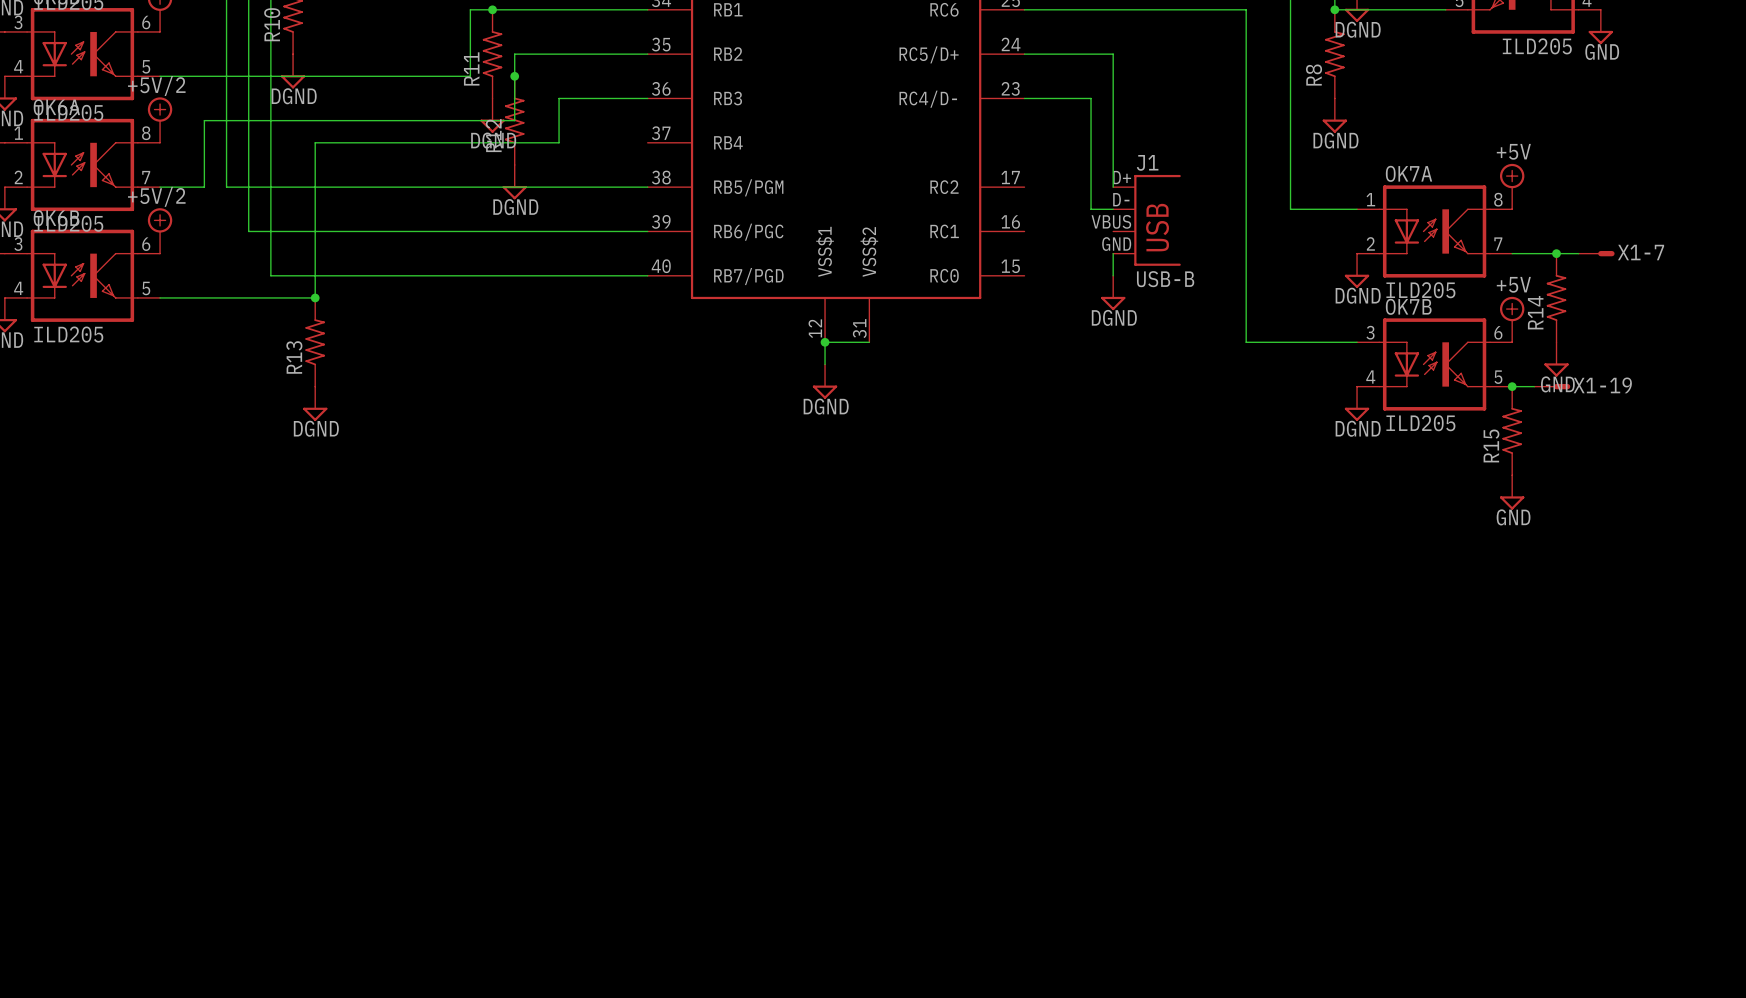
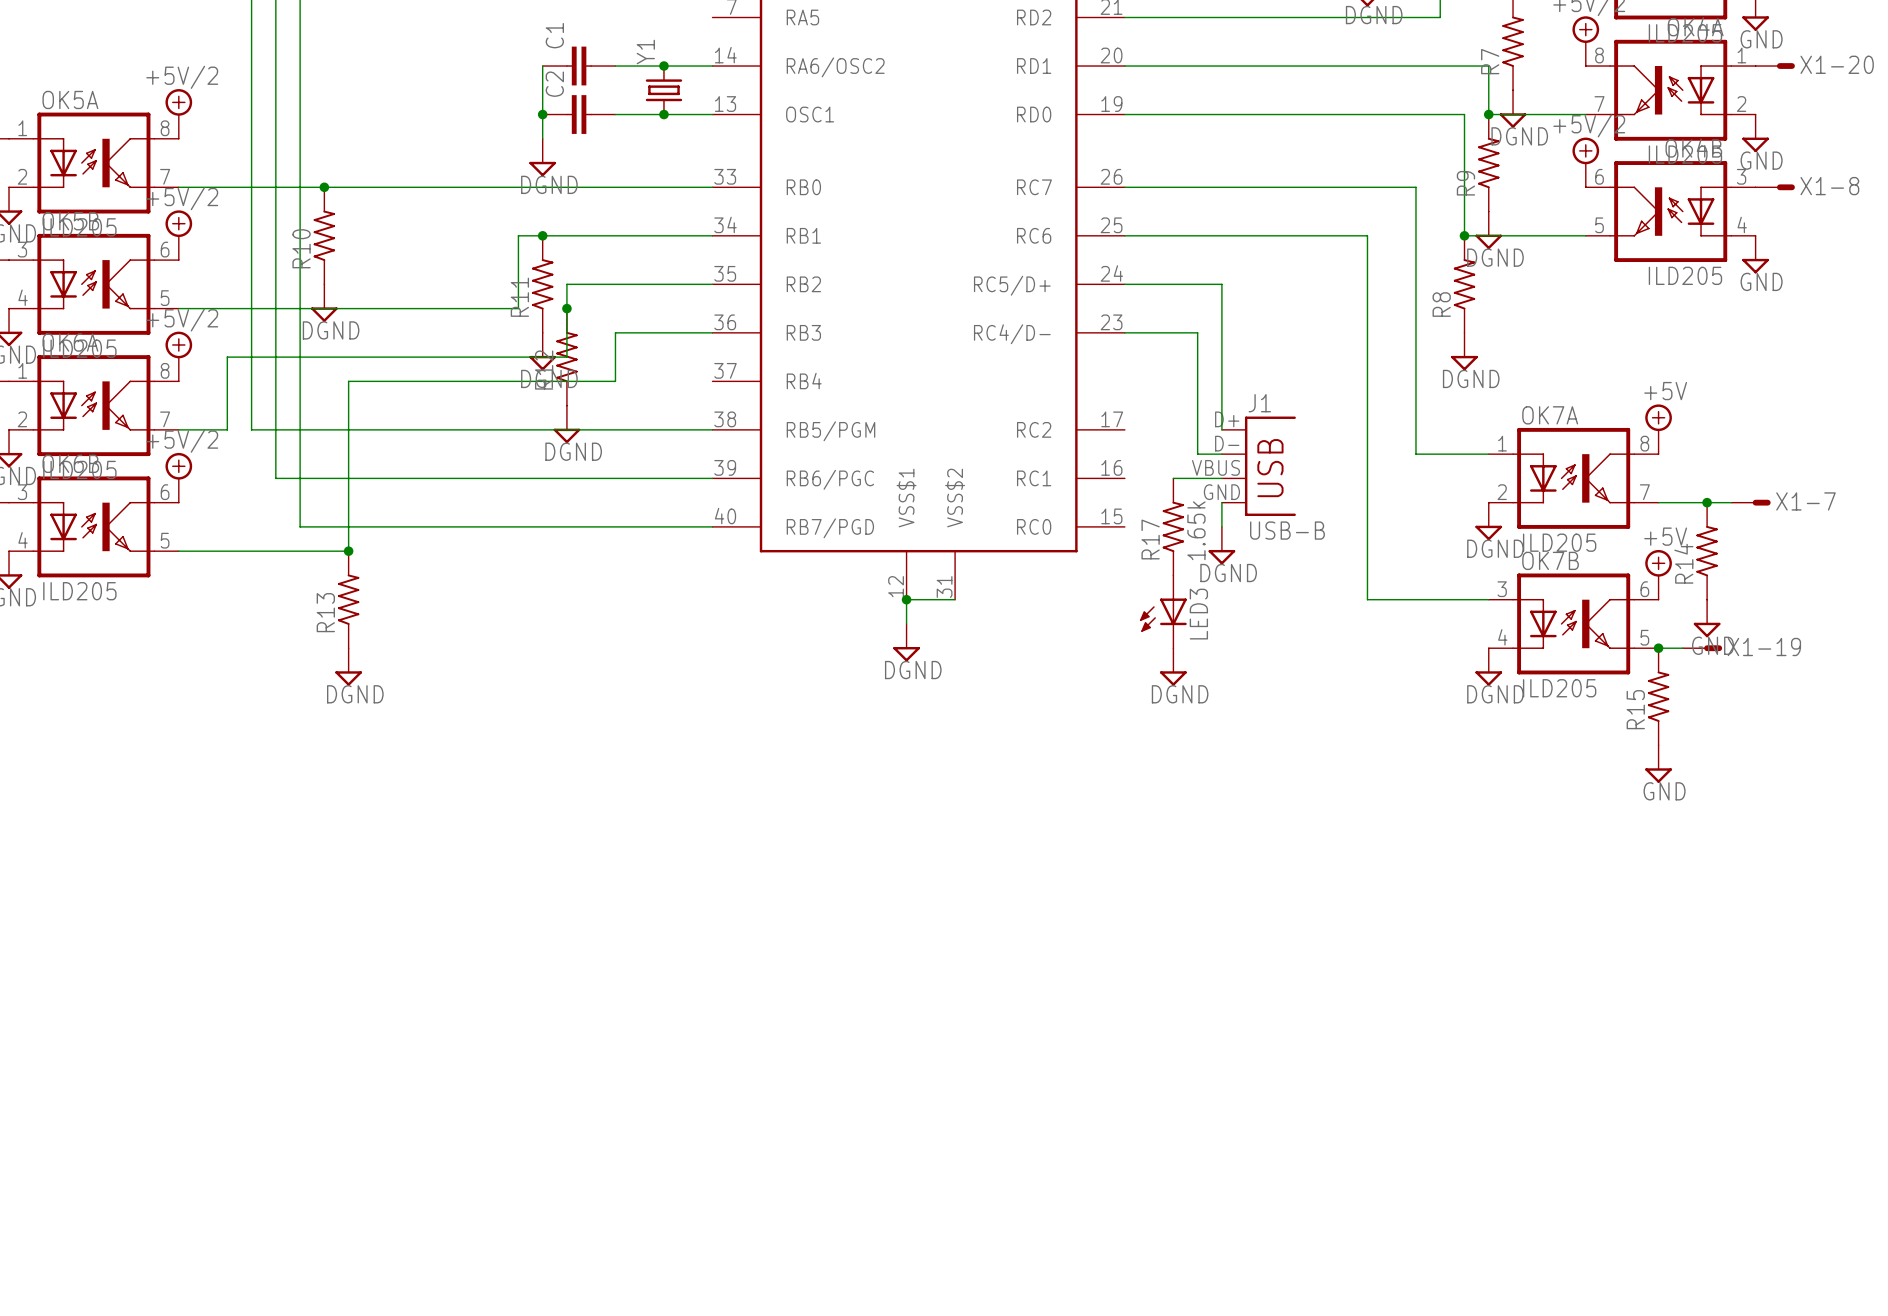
wire: none -> (1173, 478) (1221, 478)
R17: none -> 1.65k (1173, 526)
LED3: none -> (1163, 611)
power symbol: none -> DGND (1173, 667)

